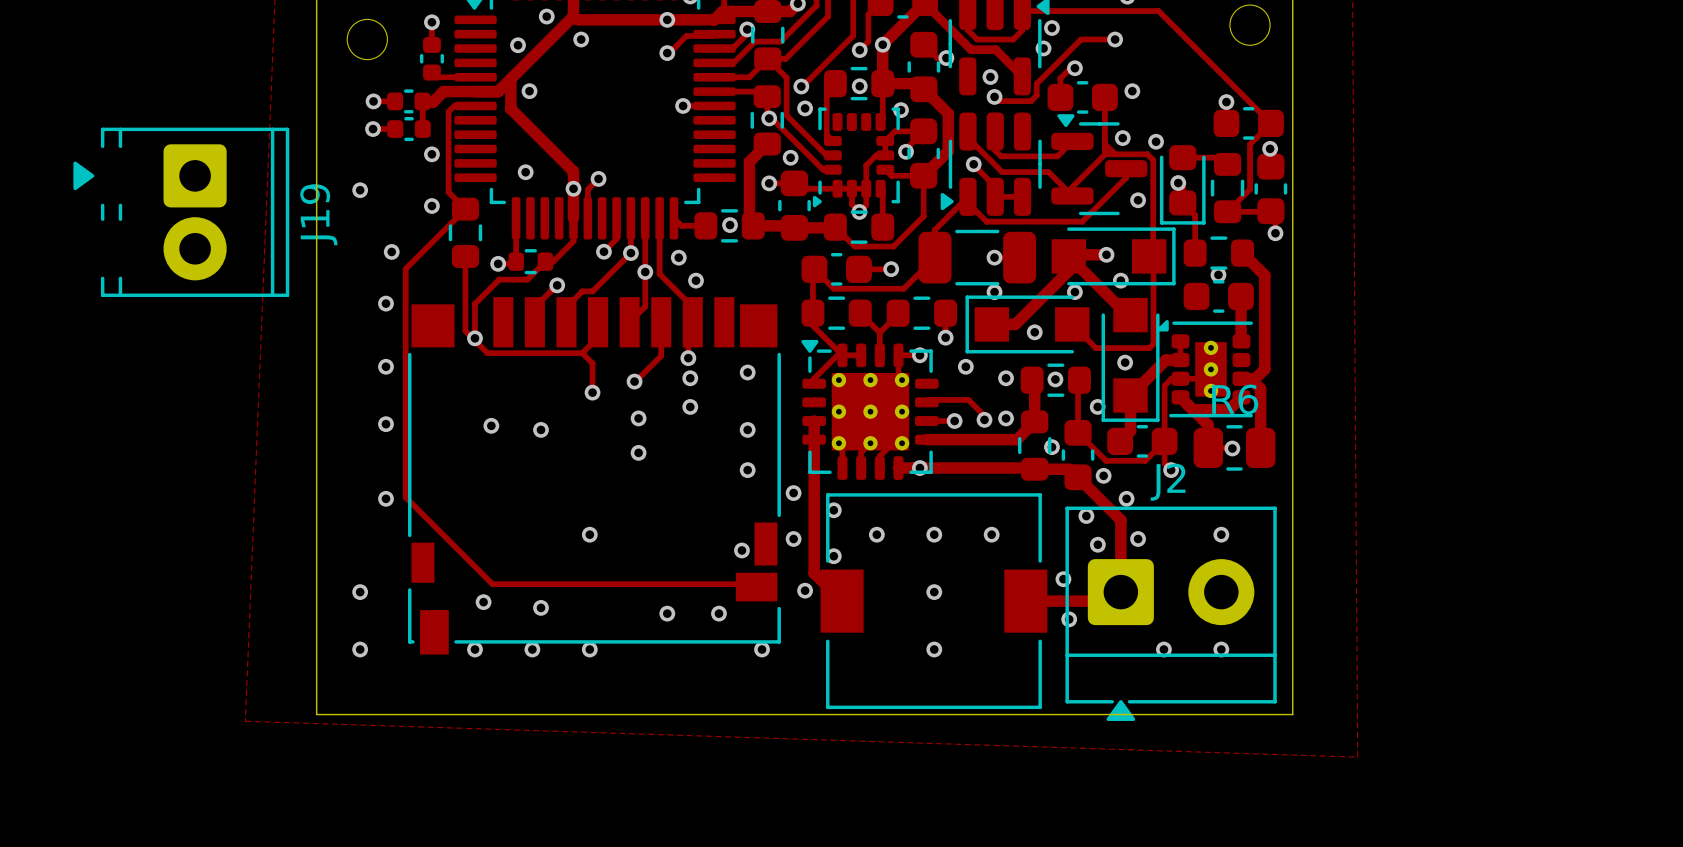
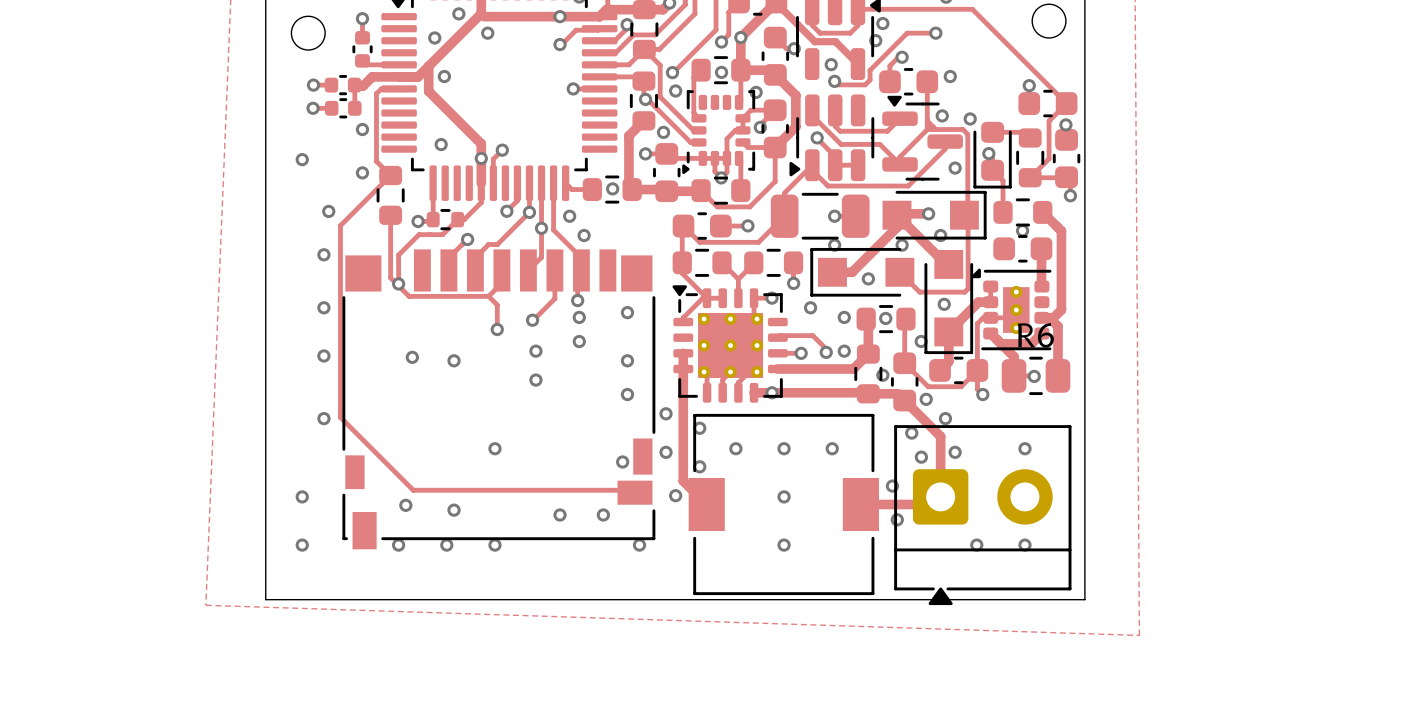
J19: (181, 212) -> none
J2 name: J2 (1168, 482) -> none

